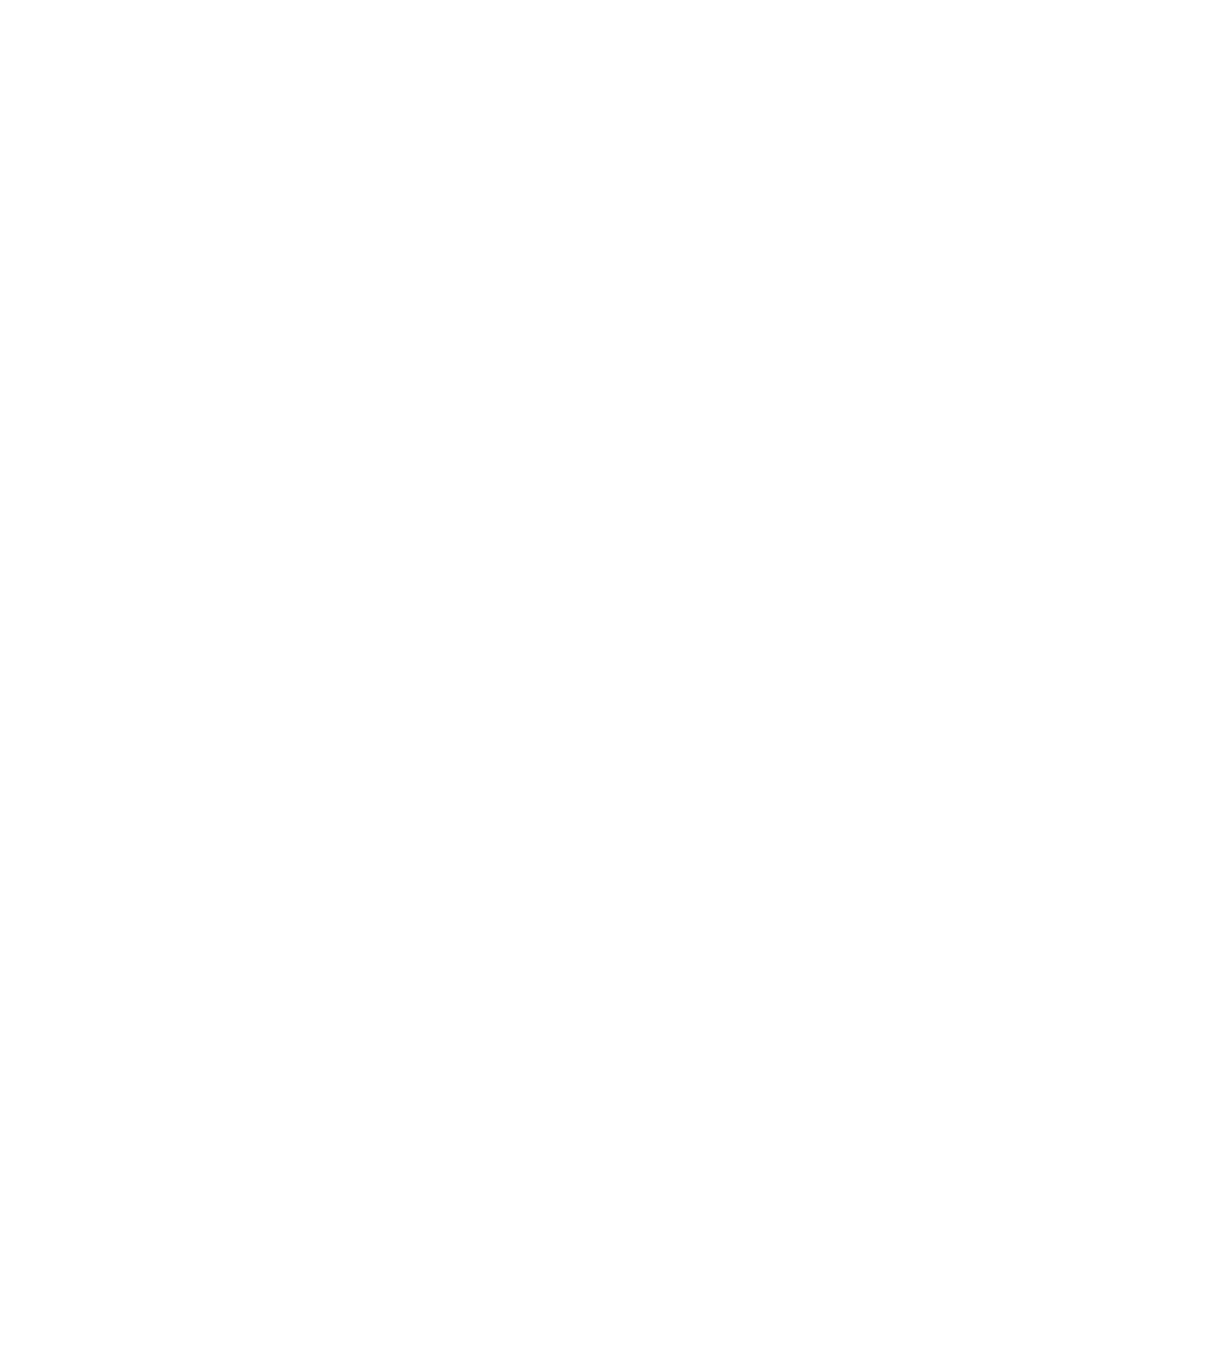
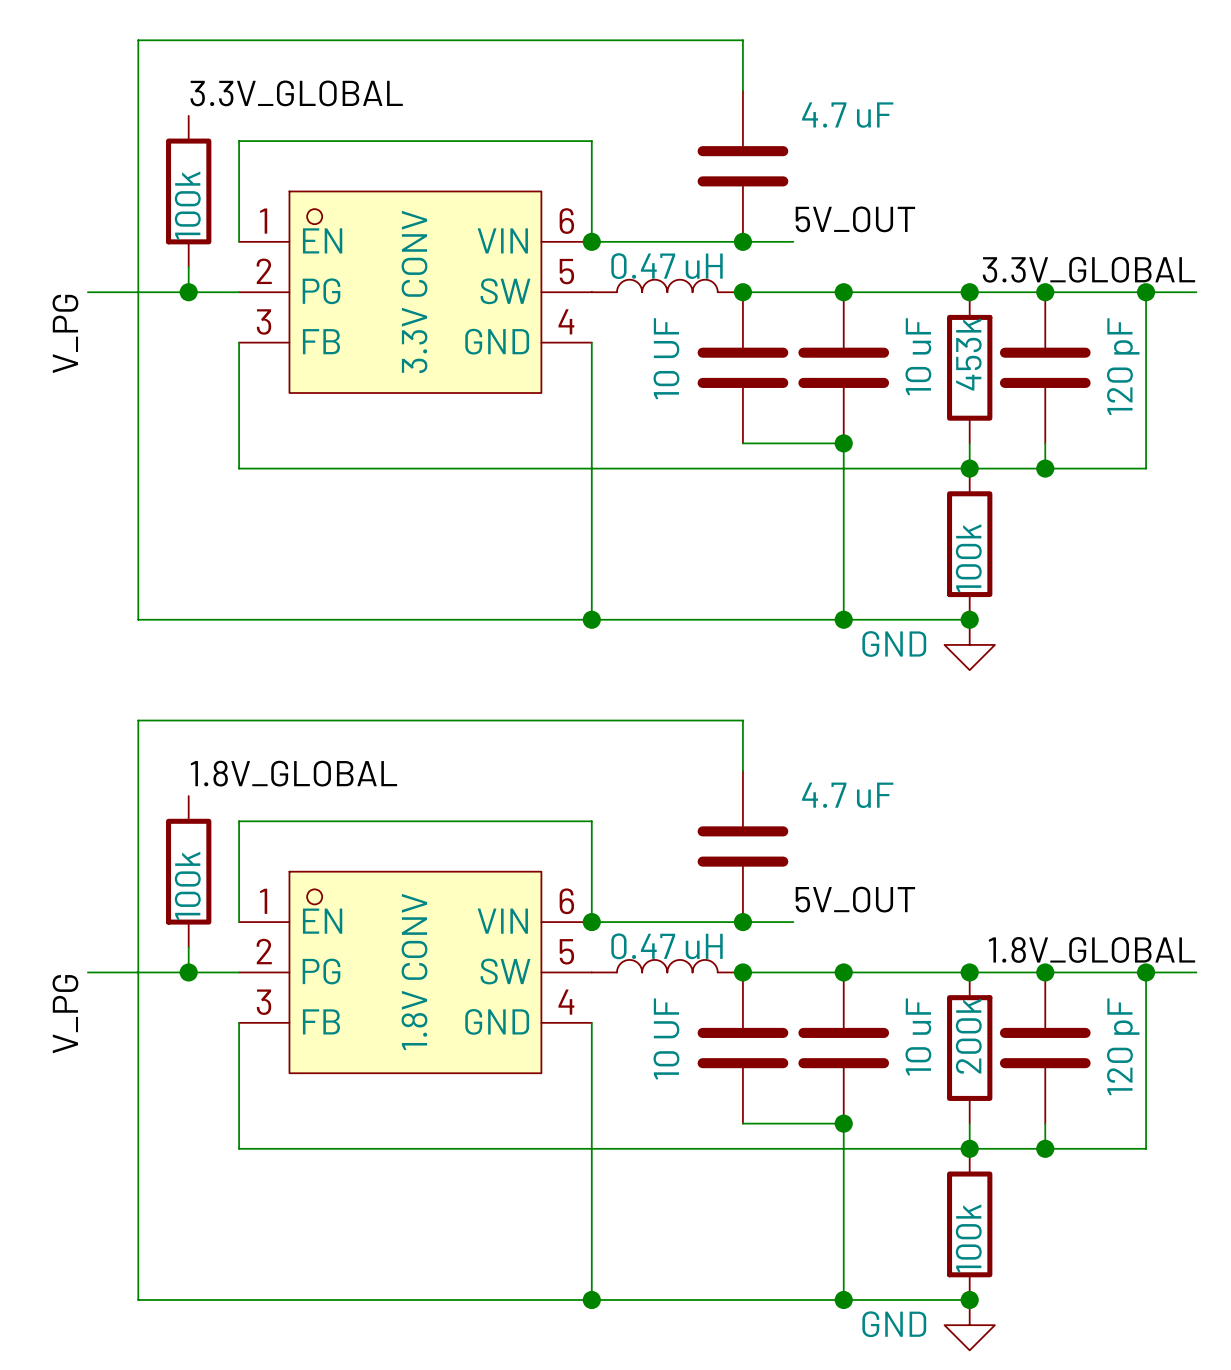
wire: none -> (742, 90) (742, 40) (138, 40) (138, 619) (969, 619)
label: none -> 3.3V_GLOBAL (296, 93)
part: none -> 4.7 uF (742, 166)
part: none -> 100k (188, 191)
label: none -> 5V_OUT (855, 219)
wire: none -> (239, 241) (239, 141) (591, 141) (591, 241) (793, 241)
junction: none -> (591, 241)
junction: none -> (742, 241)
wire: none -> (188, 267) (188, 292)
label: none -> 3.3V_GLOBAL (1088, 269)
part: none -> 0.47 uH (667, 285)
wire: none -> (87, 292) (239, 292)
junction: none -> (188, 292)
part: none -> 3.3V CONV (415, 292)
wire: none -> (742, 292) (1196, 292)
junction: none -> (742, 292)
junction: none -> (843, 292)
junction: none -> (969, 292)
junction: none -> (1045, 292)
wire: none -> (1146, 292) (1146, 468) (239, 468) (239, 342)
junction: none -> (1146, 292)
label: none -> V_PG (65, 333)
wire: none -> (591, 342) (591, 619)
part: none -> 10 UF (742, 367)
part: none -> 10 uF (843, 367)
part: none -> 453k (969, 367)
part: none -> 120 pF (1045, 367)
wire: none -> (742, 443) (843, 443) (843, 619)
junction: none -> (843, 443)
wire: none -> (969, 443) (969, 468)
wire: none -> (1045, 443) (1045, 468)
junction: none -> (969, 468)
junction: none -> (1045, 468)
part: none -> 100k (969, 544)
junction: none -> (591, 619)
junction: none -> (843, 619)
junction: none -> (969, 619)
power symbol: none -> GND (969, 644)
wire: none -> (742, 770) (742, 720) (138, 720) (138, 1299) (969, 1299)
label: none -> 1.8V_GLOBAL (293, 773)
part: none -> 4.7 uF (742, 846)
part: none -> 100k (188, 871)
label: none -> 5V_OUT (855, 899)
wire: none -> (239, 922) (239, 821) (591, 821) (591, 922) (793, 922)
junction: none -> (591, 922)
junction: none -> (742, 922)
wire: none -> (188, 947) (188, 972)
label: none -> 1.8V_GLOBAL (1091, 949)
part: none -> 0.47 uH (667, 966)
wire: none -> (87, 972) (239, 972)
junction: none -> (188, 972)
part: none -> 1.8V CONV (415, 972)
wire: none -> (742, 972) (1196, 972)
junction: none -> (742, 972)
junction: none -> (843, 972)
junction: none -> (969, 972)
junction: none -> (1045, 972)
wire: none -> (1146, 972) (1146, 1148) (239, 1148) (239, 1022)
junction: none -> (1146, 972)
label: none -> V_PG (65, 1014)
wire: none -> (591, 1022) (591, 1299)
part: none -> 10 UF (742, 1048)
part: none -> 10 uF (843, 1048)
part: none -> 200k (969, 1048)
part: none -> 120 pF (1045, 1048)
wire: none -> (742, 1123) (843, 1123) (843, 1299)
junction: none -> (843, 1123)
wire: none -> (969, 1123) (969, 1148)
wire: none -> (1045, 1123) (1045, 1148)
junction: none -> (969, 1148)
junction: none -> (1045, 1148)
part: none -> 100k (969, 1224)
junction: none -> (591, 1299)
junction: none -> (843, 1299)
junction: none -> (969, 1299)
power symbol: none -> GND (969, 1325)

